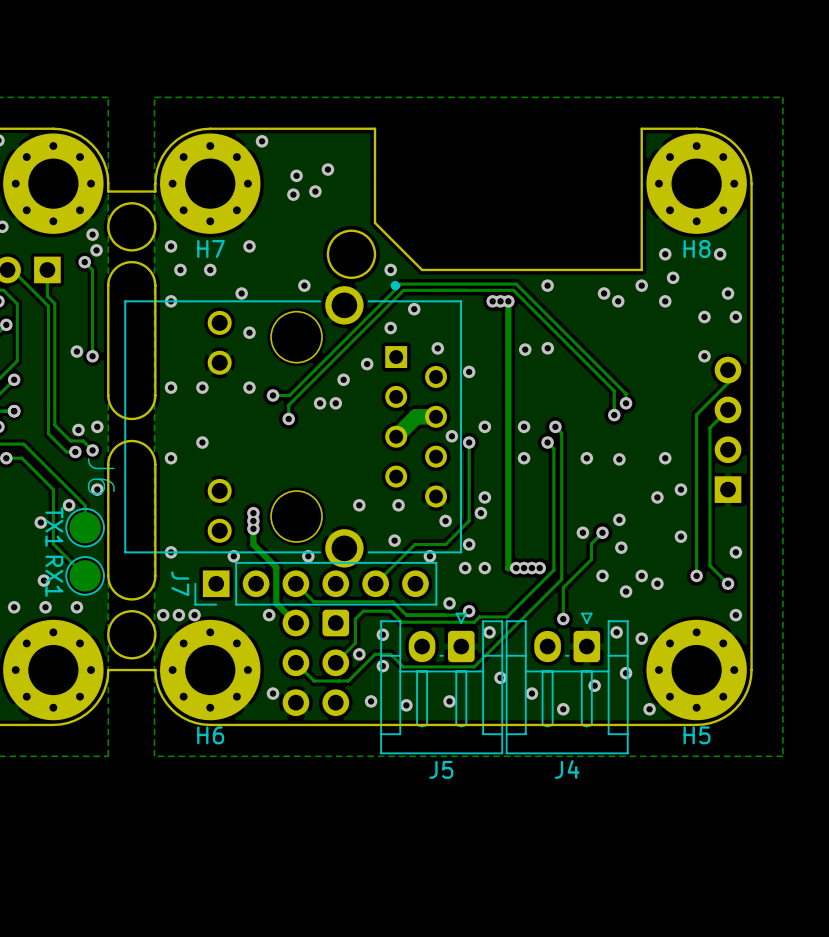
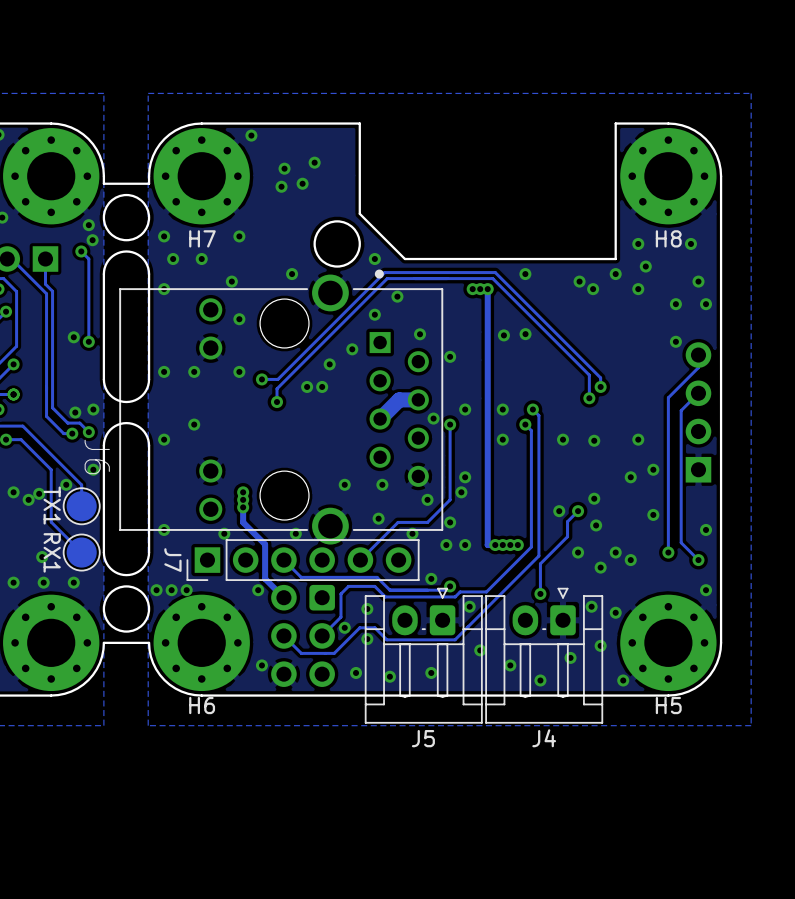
via: none -> (13, 492)
via: none -> (39, 493)
via: none -> (28, 499)
via: (40, 522) -> none

